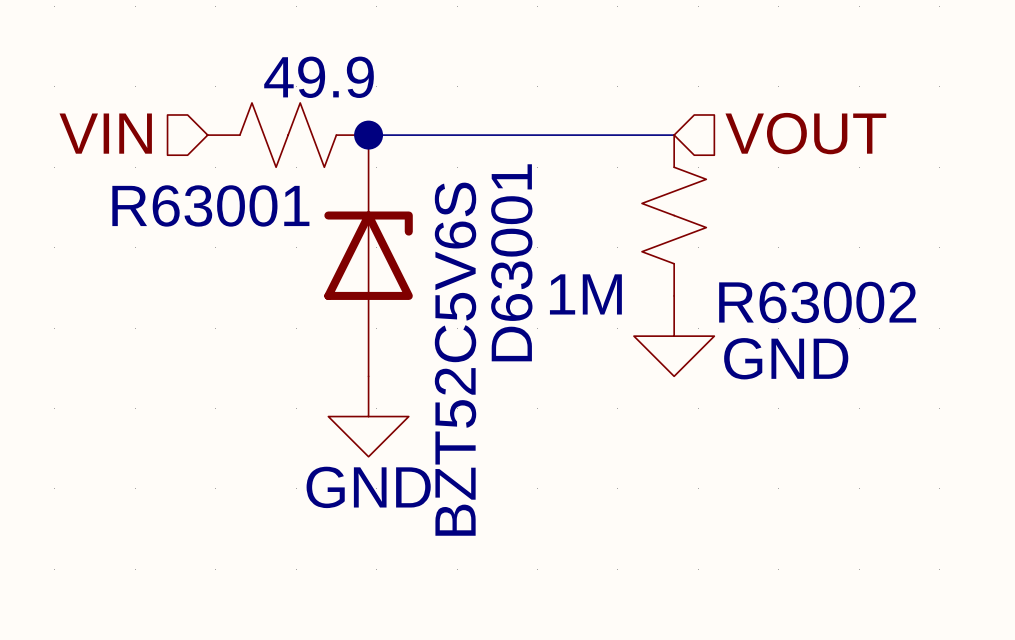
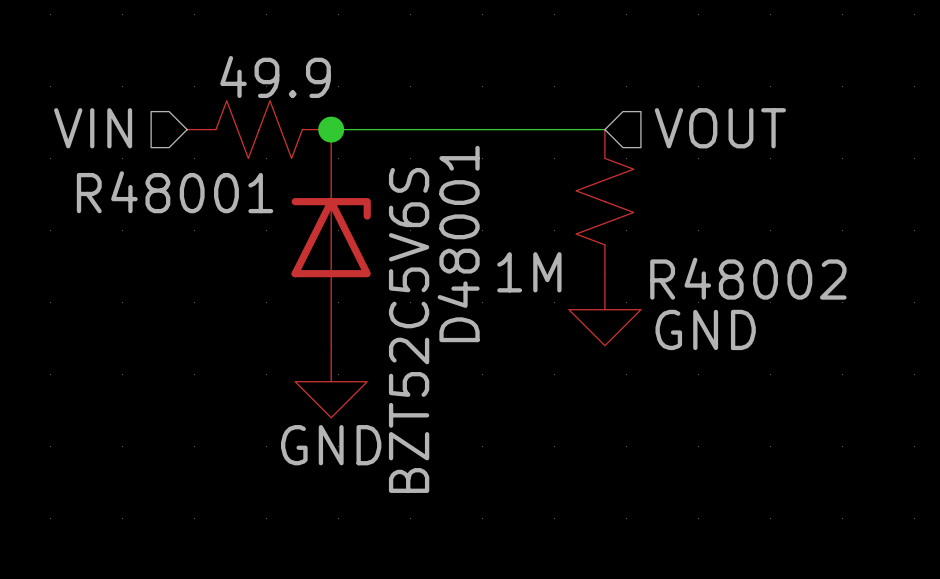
R63001 name: R63001 (210, 205) -> R48001 (175, 192)
D63001 name: D63001 (511, 262) -> D48001 (458, 244)
R63002 name: R63002 (817, 302) -> R48002 (748, 278)

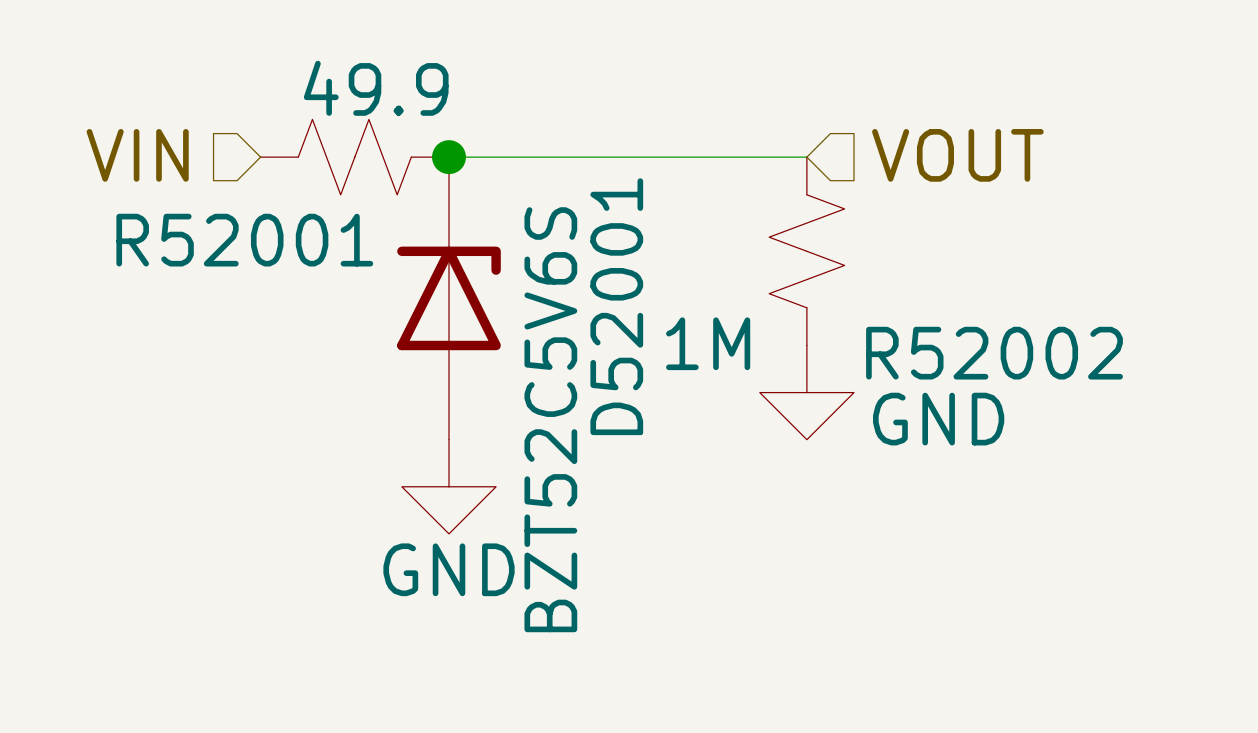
R48001 name: R48001 (175, 192) -> R52001 (244, 240)
D48001 name: D48001 (458, 244) -> D52001 (616, 306)
R48002 name: R48002 (748, 278) -> R52002 (994, 353)

